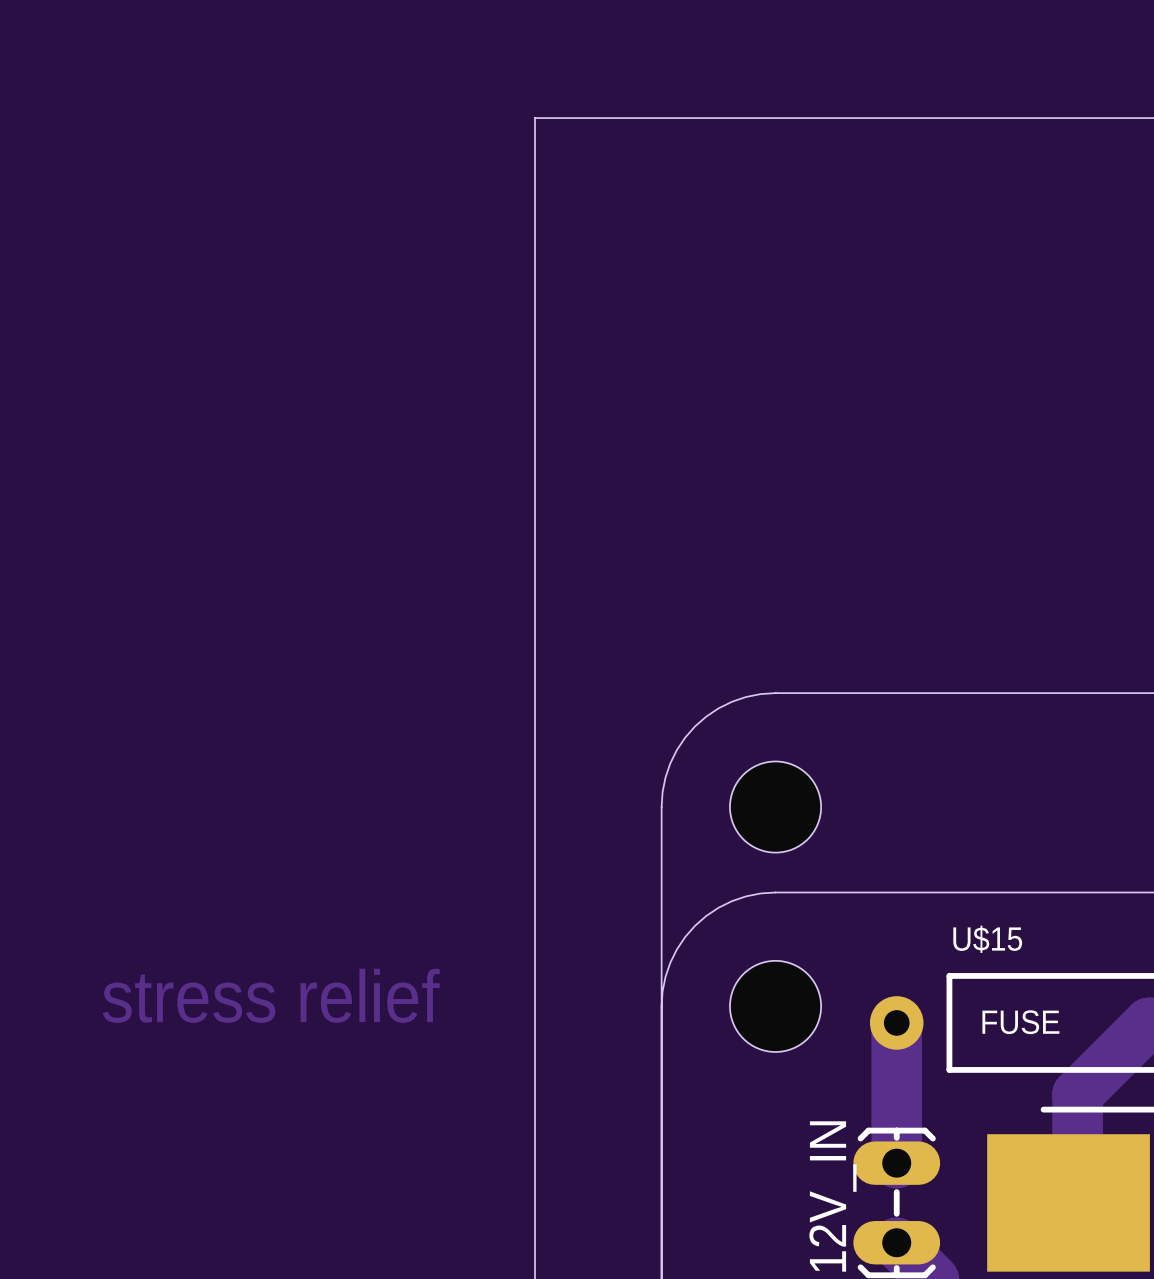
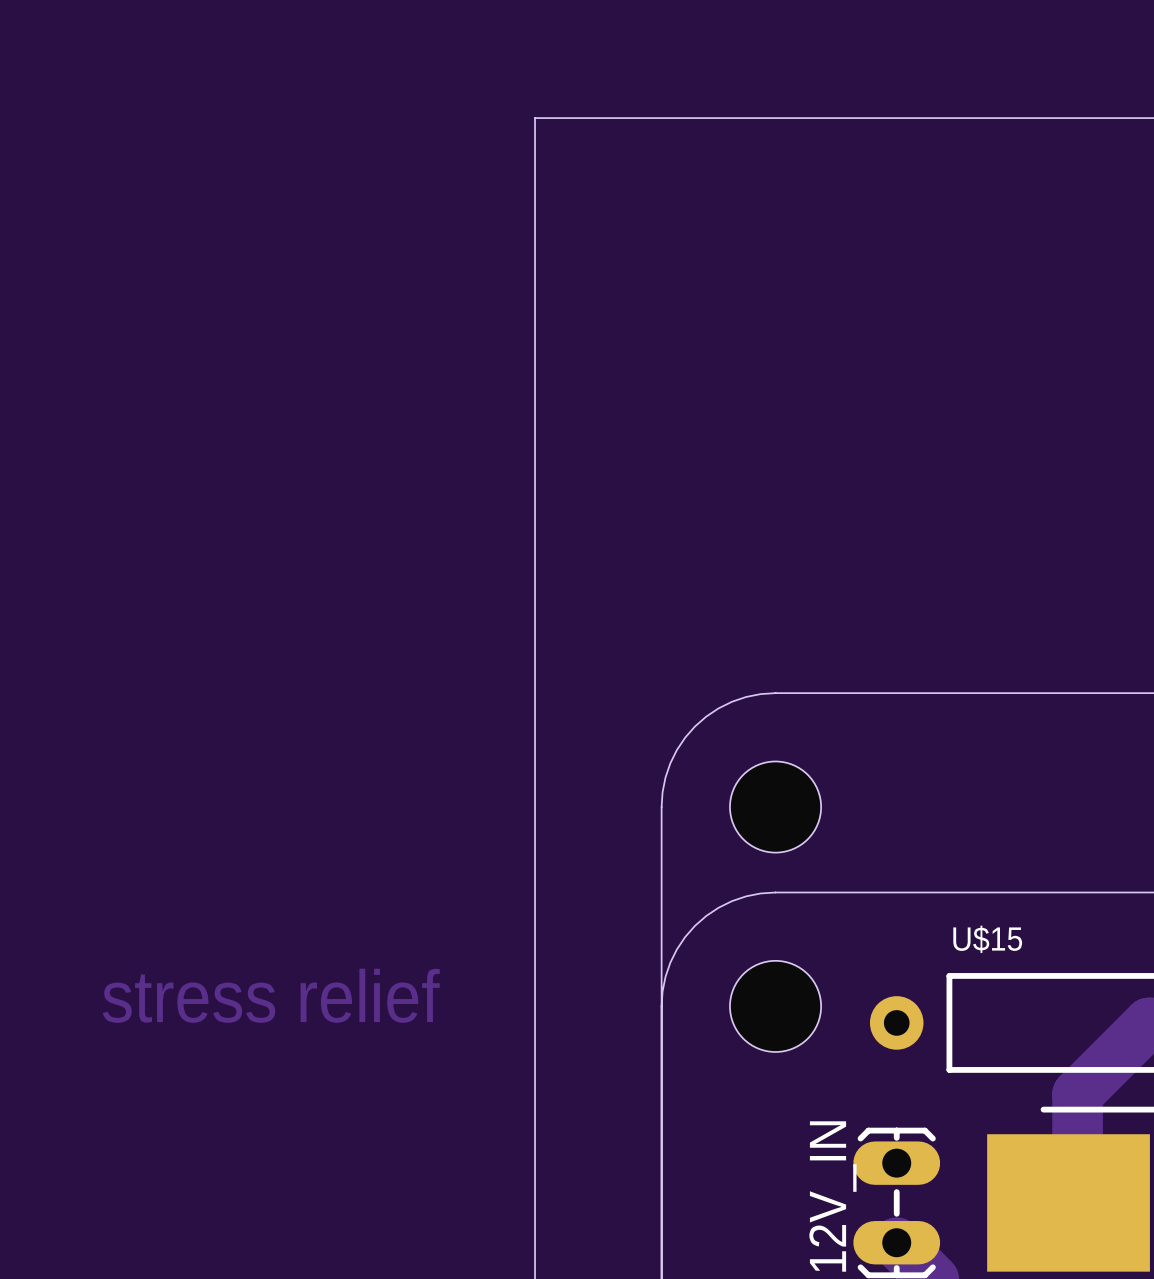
track: (896, 1022) (896, 1163) -> none
U$15 value: FUSE (1020, 1022) -> none

